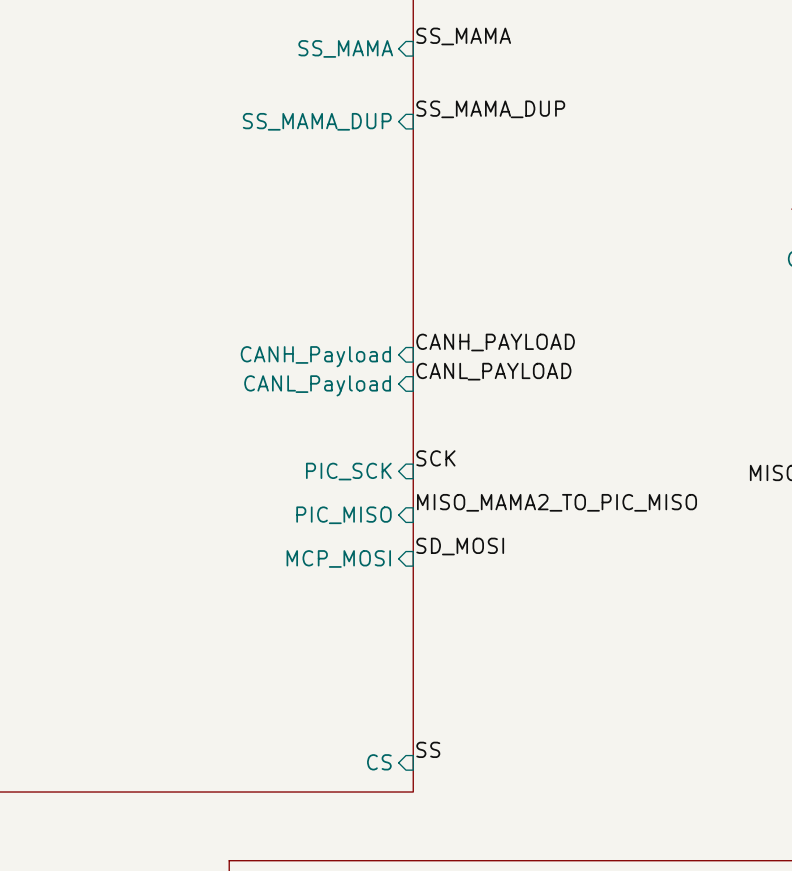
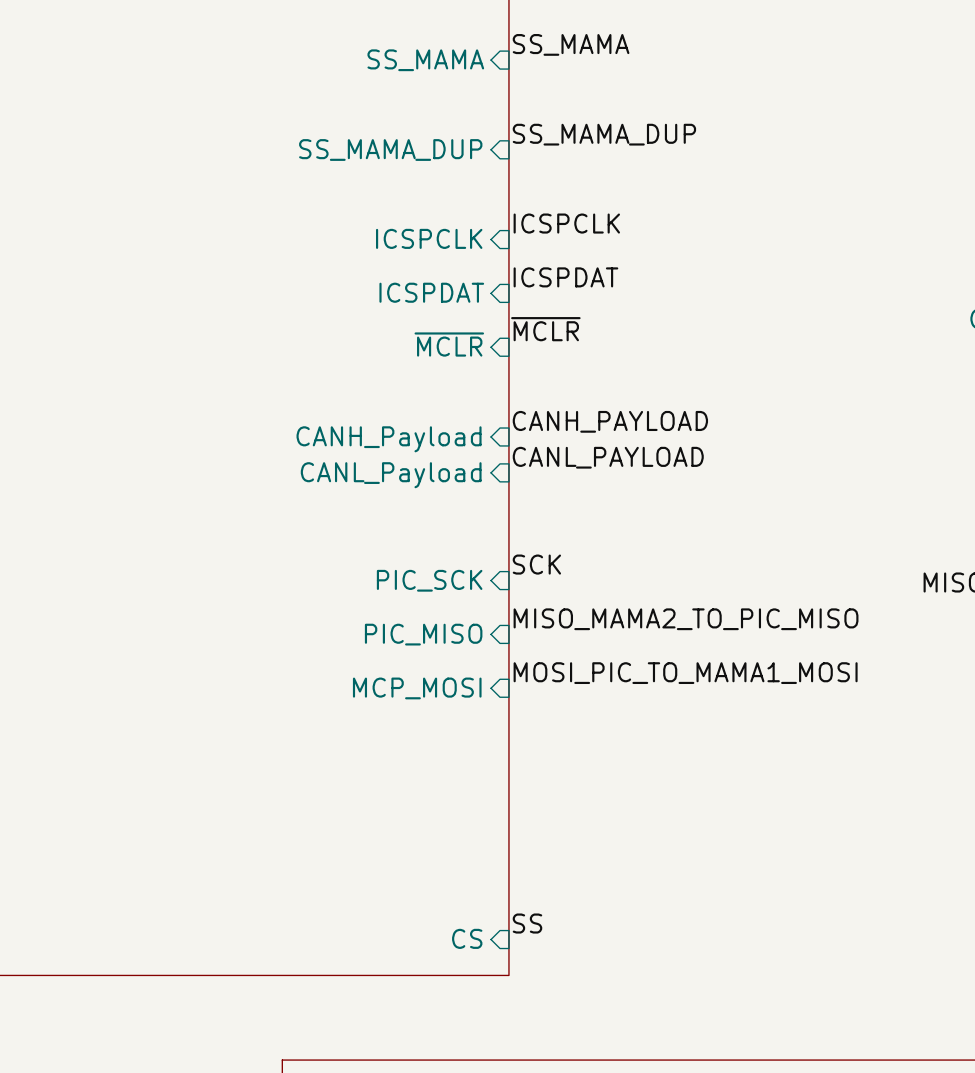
label: none -> ICSPCLK (566, 223)
sheet pin: none -> ICSPCLK (429, 238)
label: none -> ICSPDAT (565, 277)
sheet pin: none -> ICSPDAT (431, 292)
label: none -> ~{MCLR} (545, 329)
sheet pin: none -> ~{MCLR} (449, 344)
label: SD_MOSI (460, 546) -> MOSI_PIC_TO_MAMA1_MOSI (685, 673)

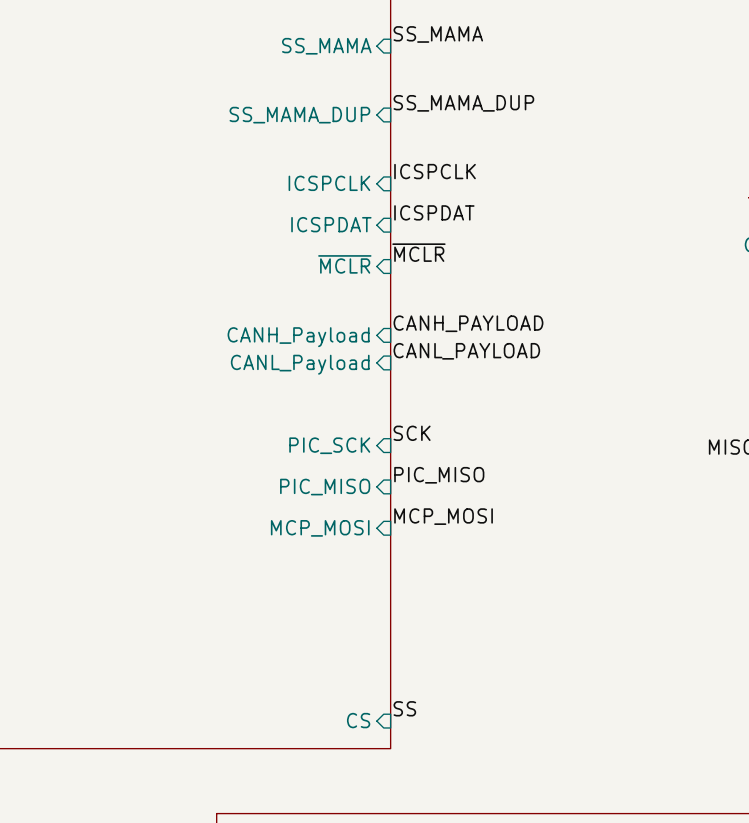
label: MISO_MAMA2_TO_PIC_MISO (686, 619) -> PIC_MISO (439, 475)
label: MOSI_PIC_TO_MAMA1_MOSI (685, 673) -> MCP_MOSI (443, 516)

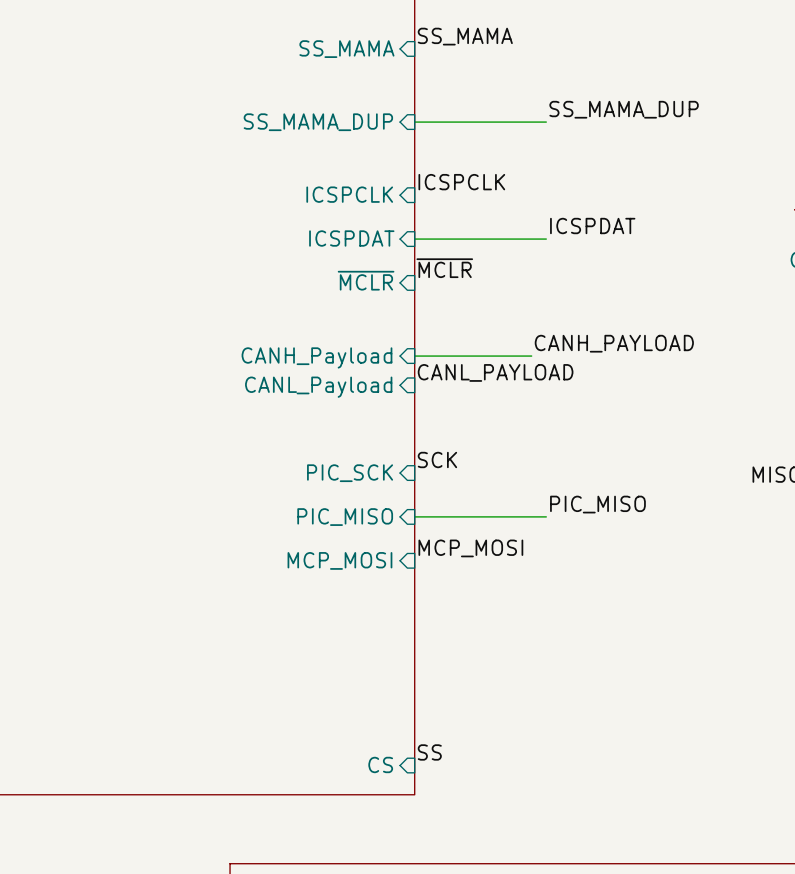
label position: SS_MAMA_DUP (463, 103) -> SS_MAMA_DUP (624, 109)
wire: none -> (414, 122) (546, 122)
label position: ICSPDAT (434, 212) -> ICSPDAT (592, 226)
wire: none -> (414, 239) (546, 239)
label position: CANH_PAYLOAD (468, 323) -> CANH_PAYLOAD (614, 343)
wire: none -> (414, 356) (531, 356)
label position: PIC_MISO (439, 475) -> PIC_MISO (597, 504)
wire: none -> (414, 516) (546, 516)

